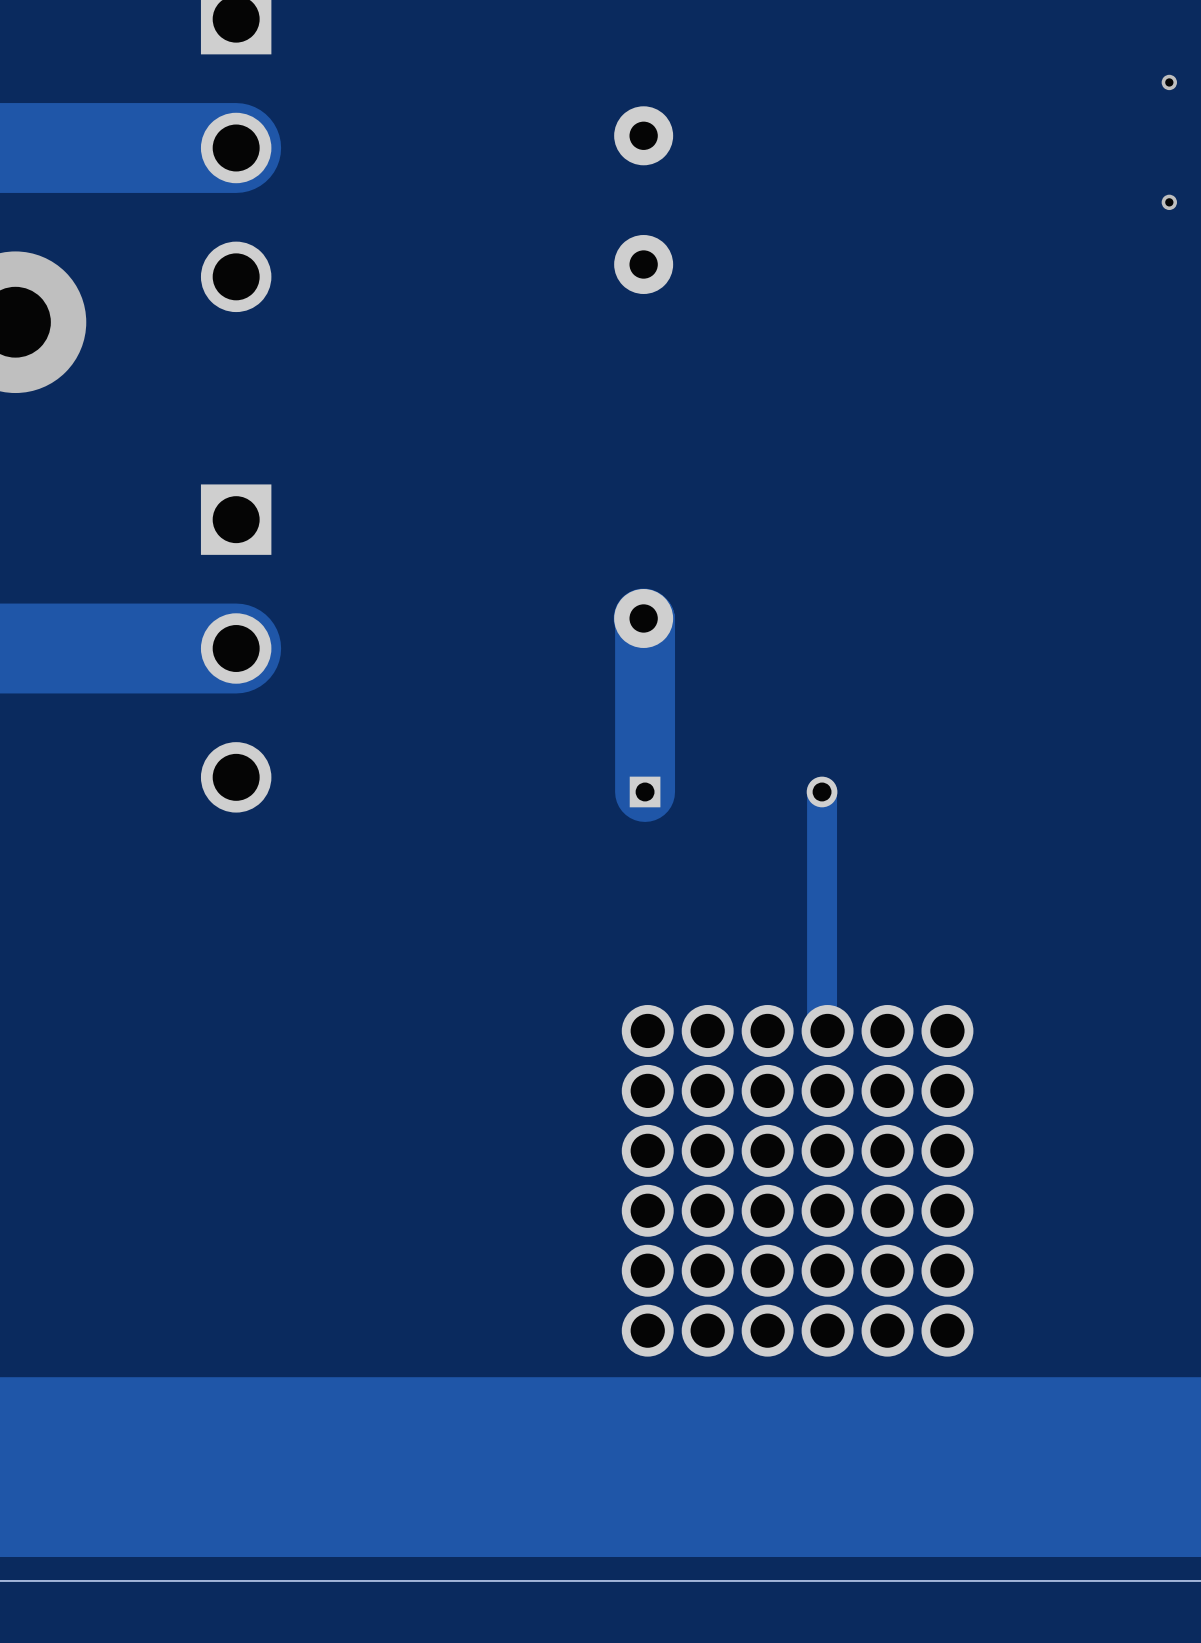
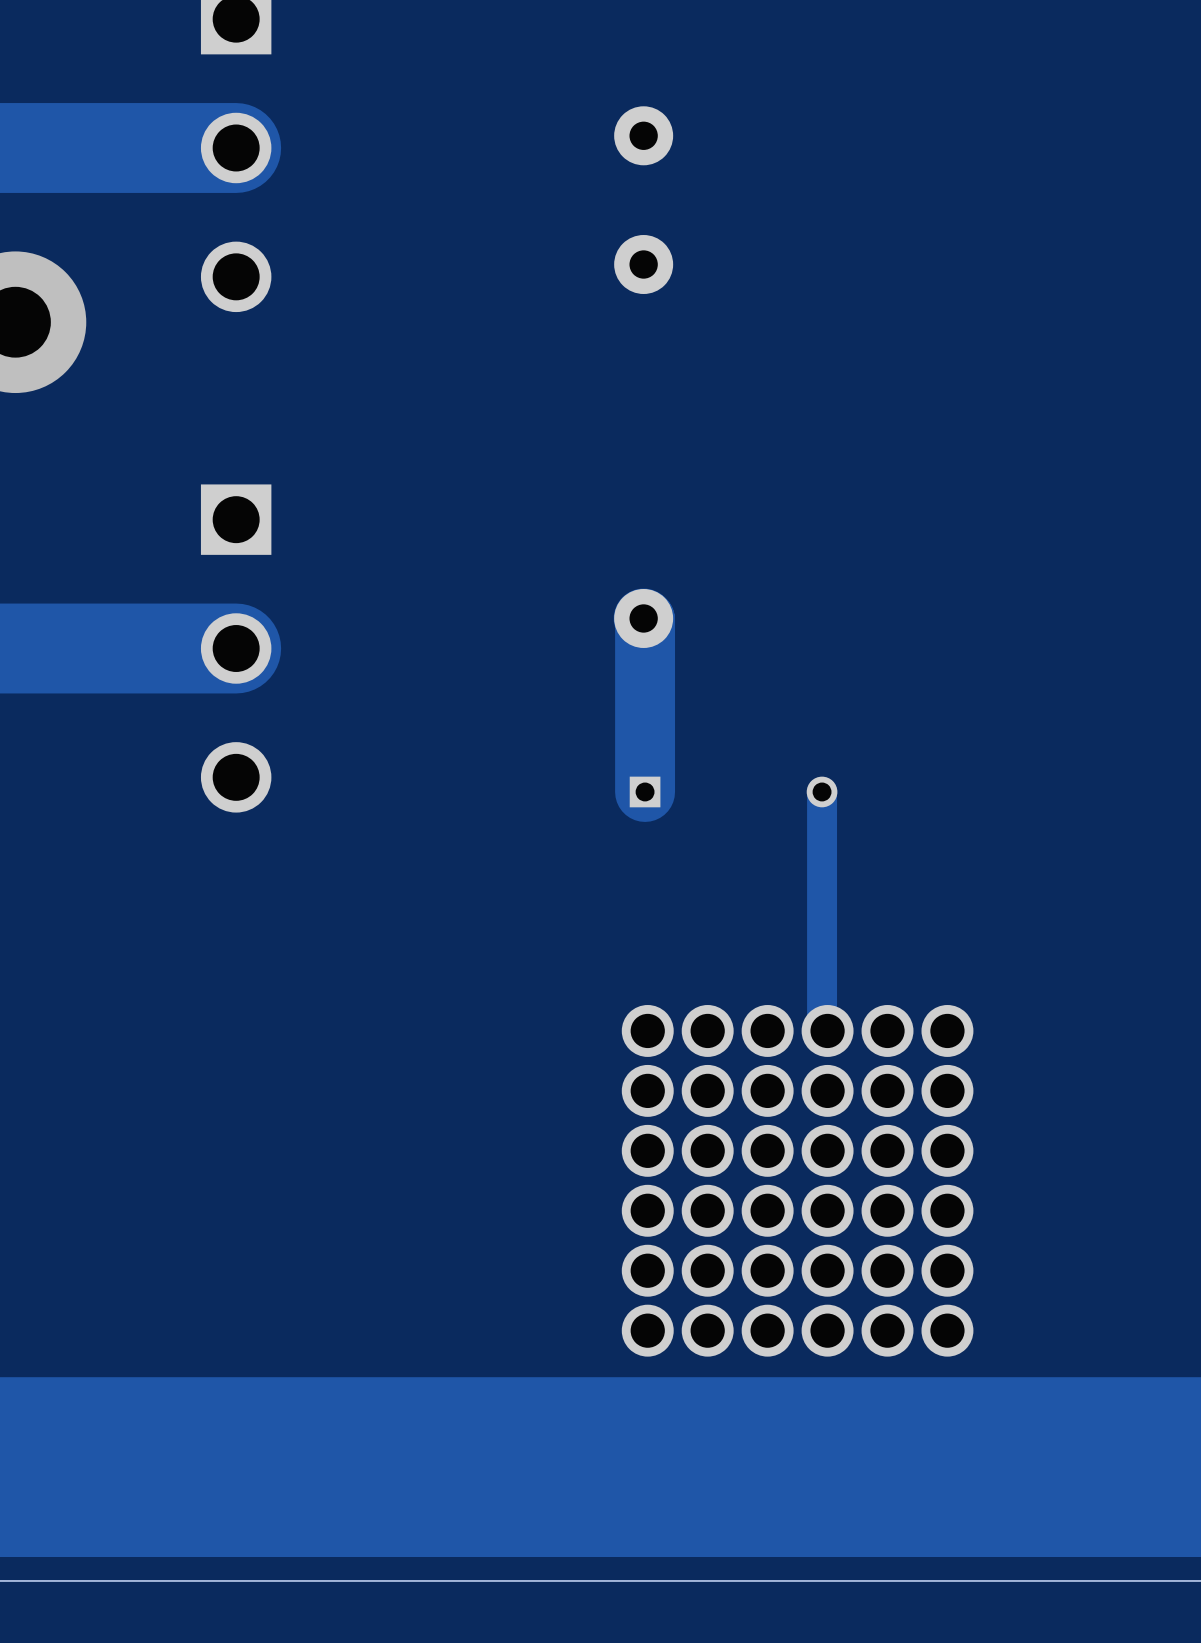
via: (1169, 82) -> none
via: (1169, 202) -> none

